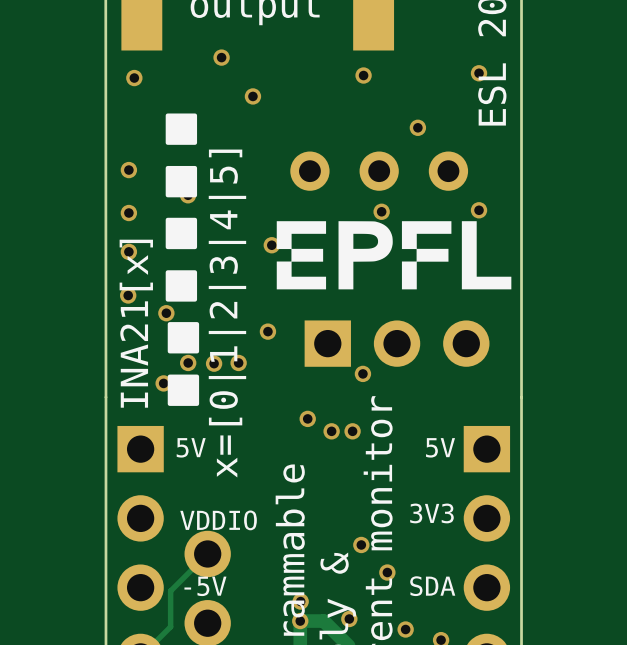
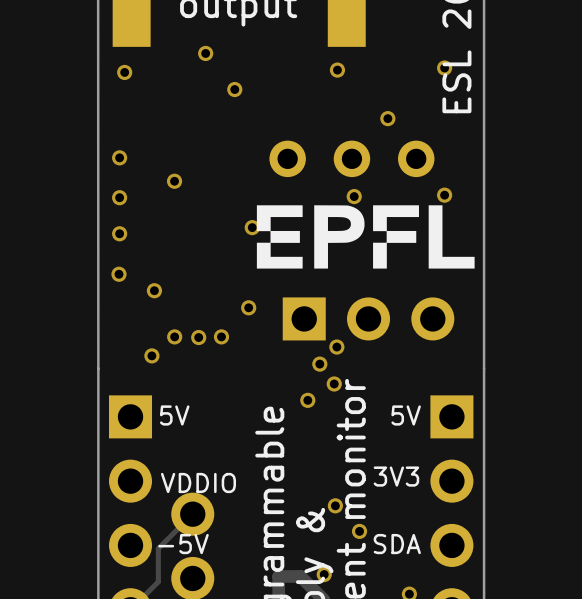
drawing: [165, 113, 200, 406] -> none
text: x=[0|1|2|3|4|5] (227, 313) -> none
text: INA21[x] (136, 323) -> none
via: none -> (319, 364)
via: (307, 418) -> none
via position: (352, 431) -> (334, 383)
via: (300, 601) -> none
via: (300, 621) -> none
via: (405, 629) -> none

